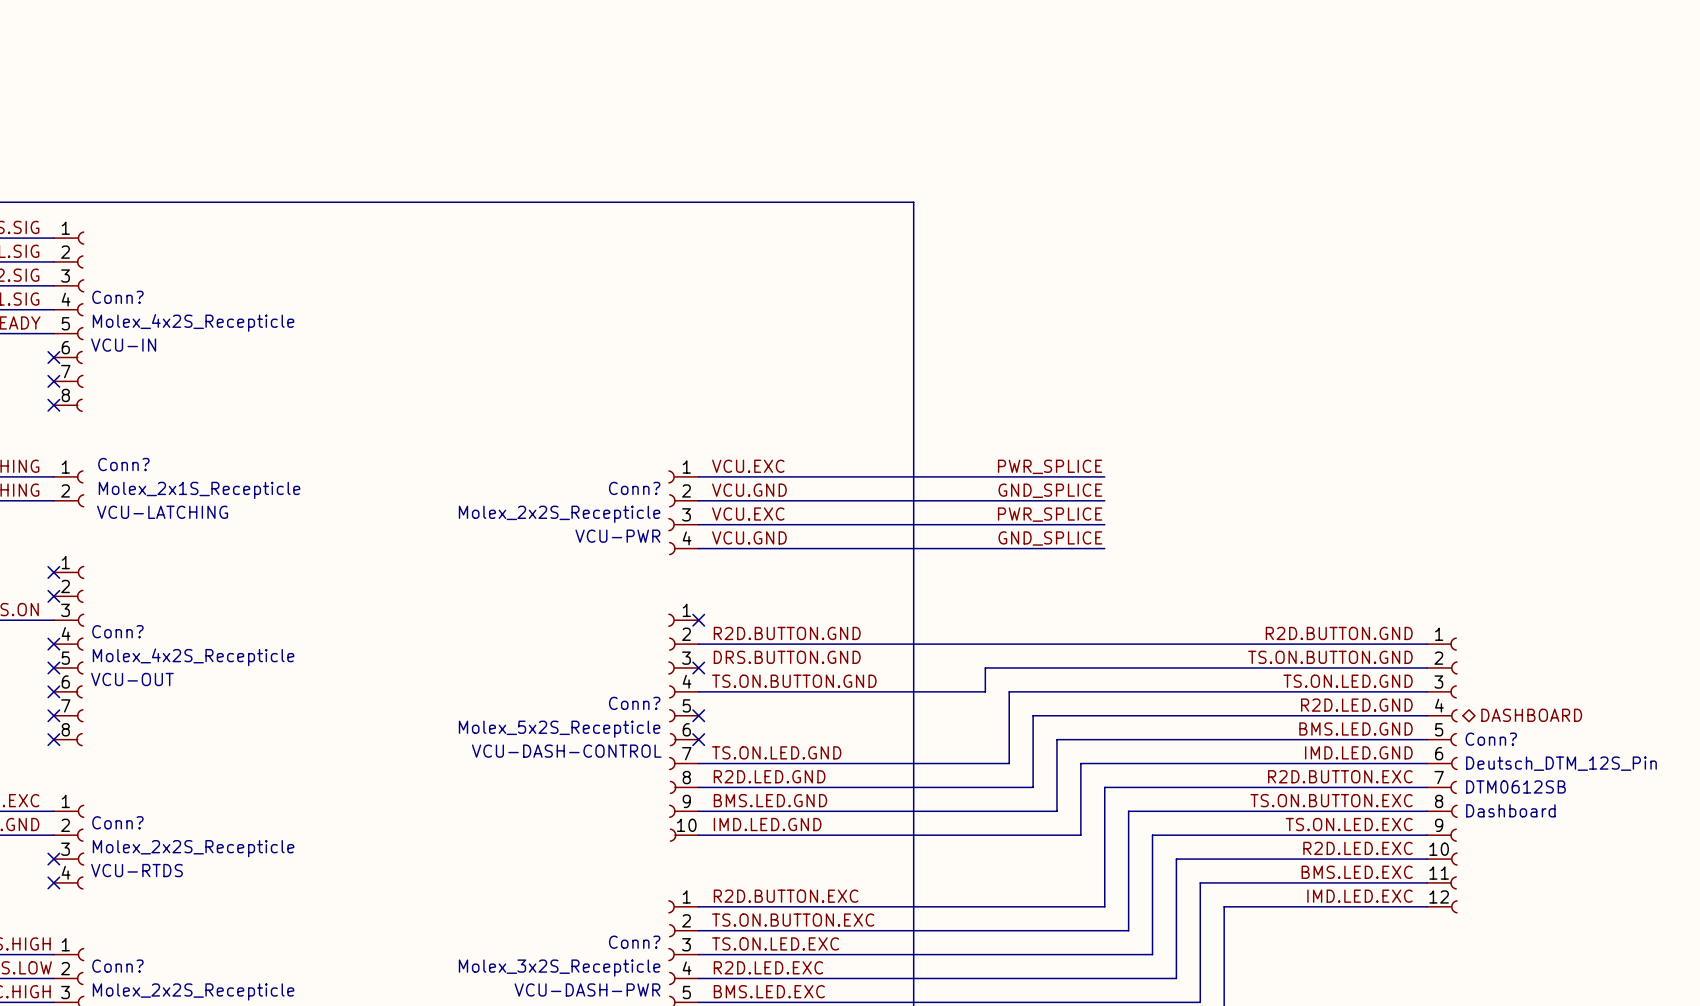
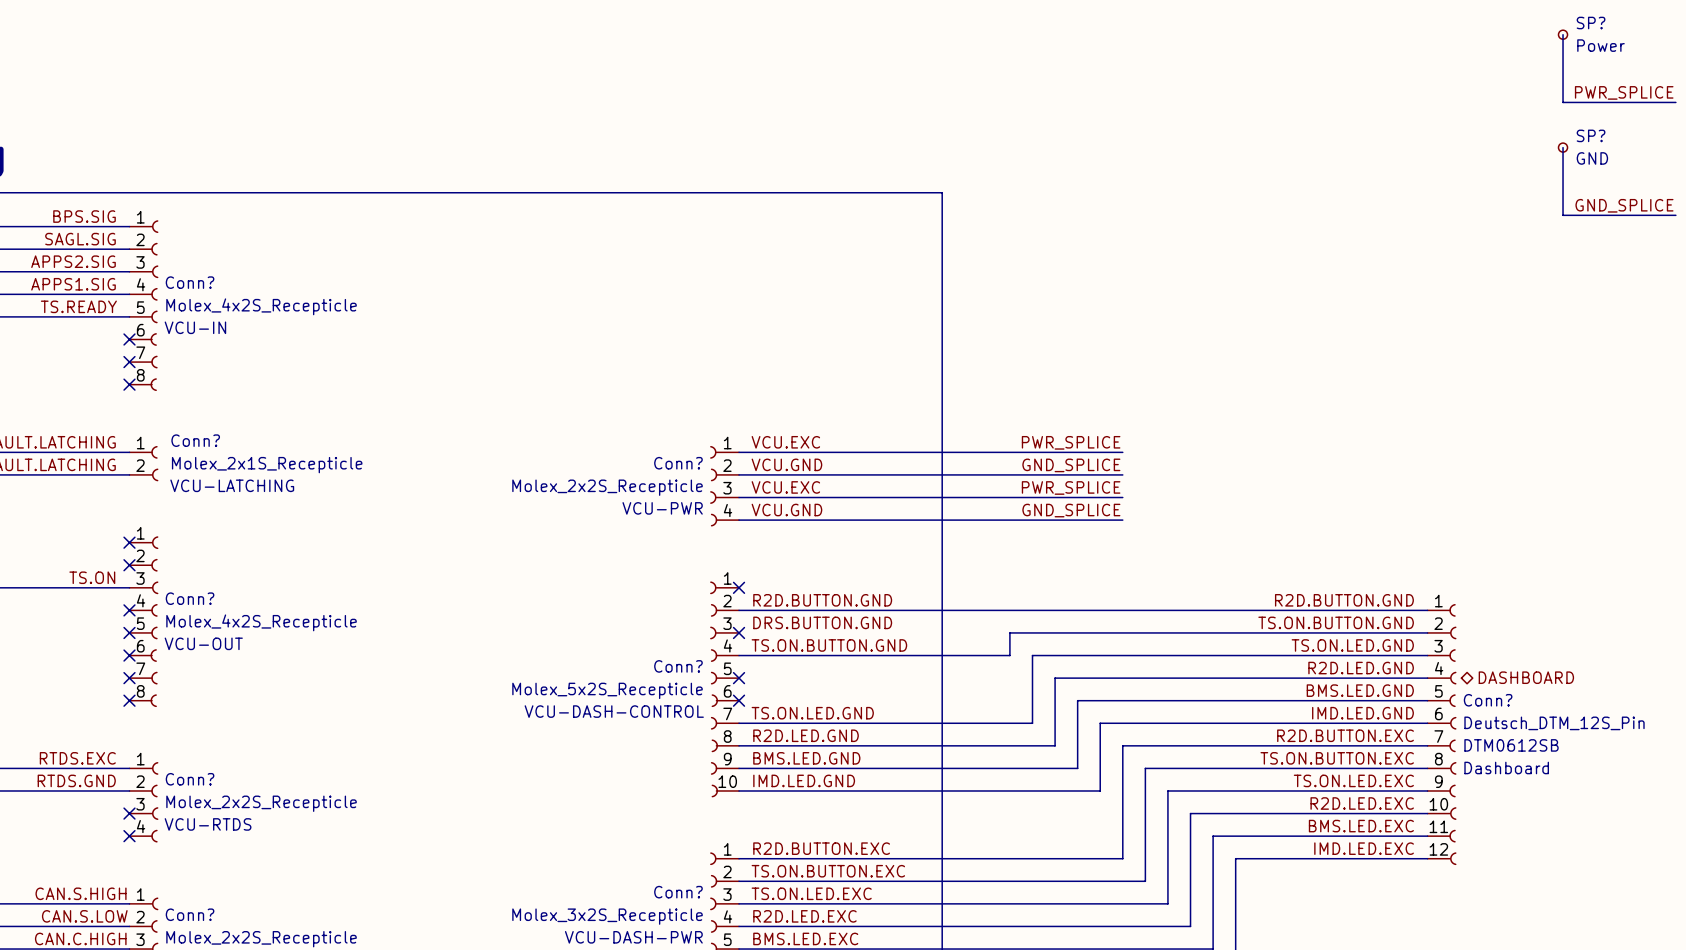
wire: none -> (1563, 34) (1563, 102) (1675, 102)
SP?: none -> Power (1563, 34)
label: none -> PWR_SPLICE (1624, 92)
wire: none -> (1563, 147) (1563, 215) (1675, 215)
SP?: none -> GND (1563, 147)
label: none -> GND_SPLICE (1624, 205)

